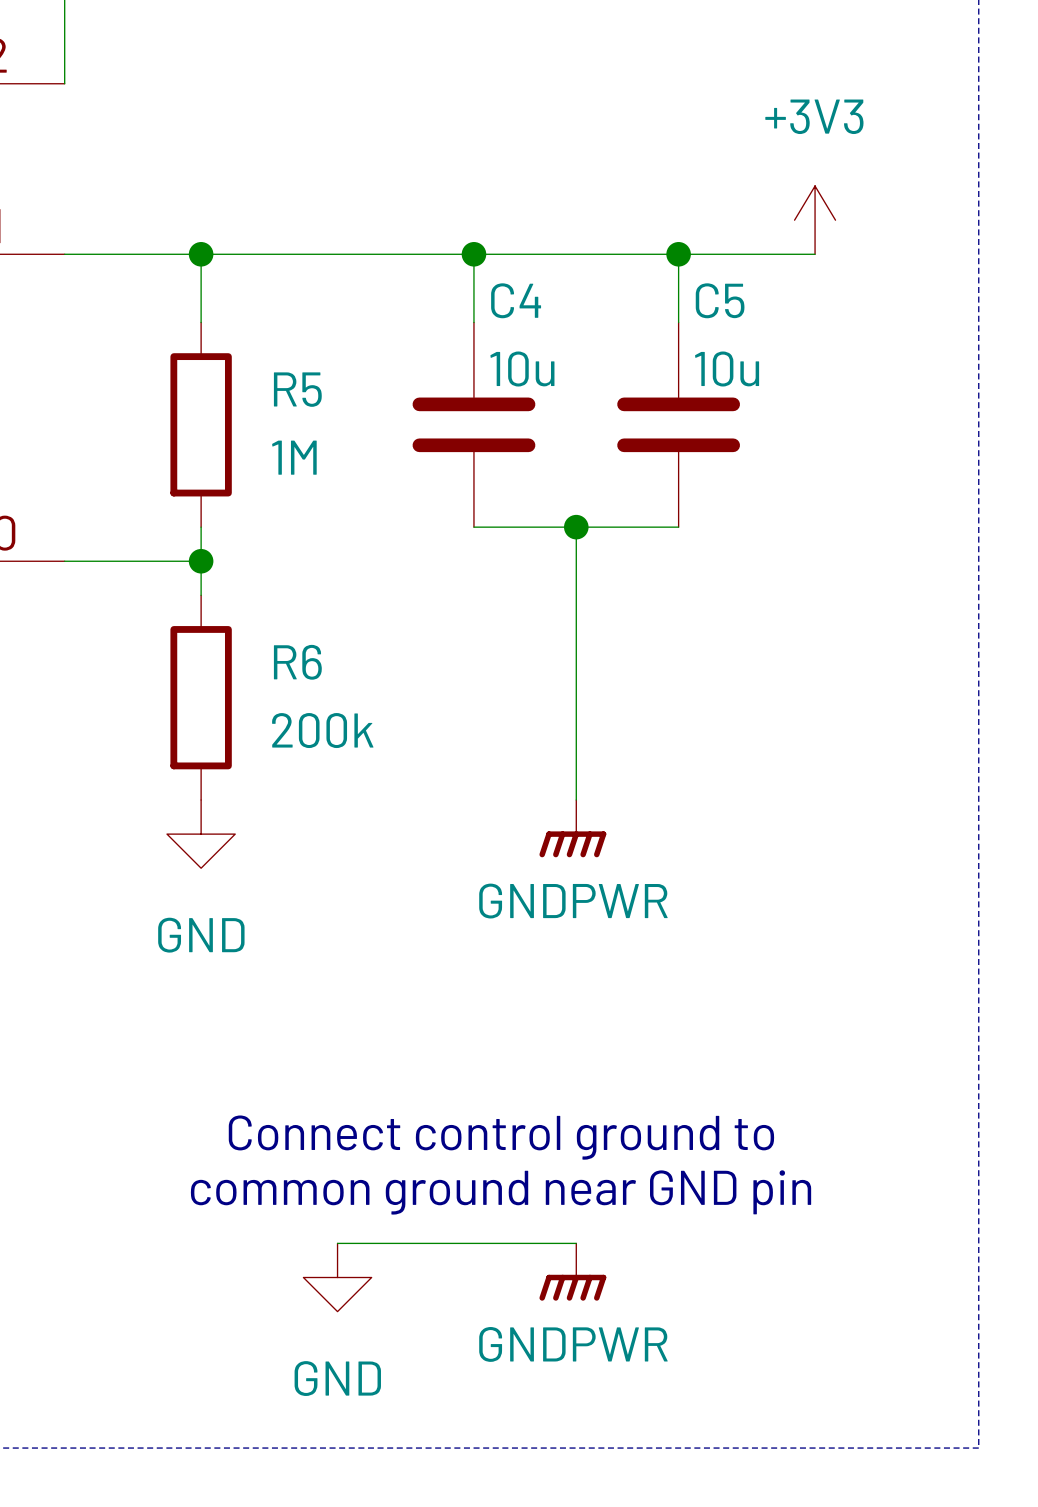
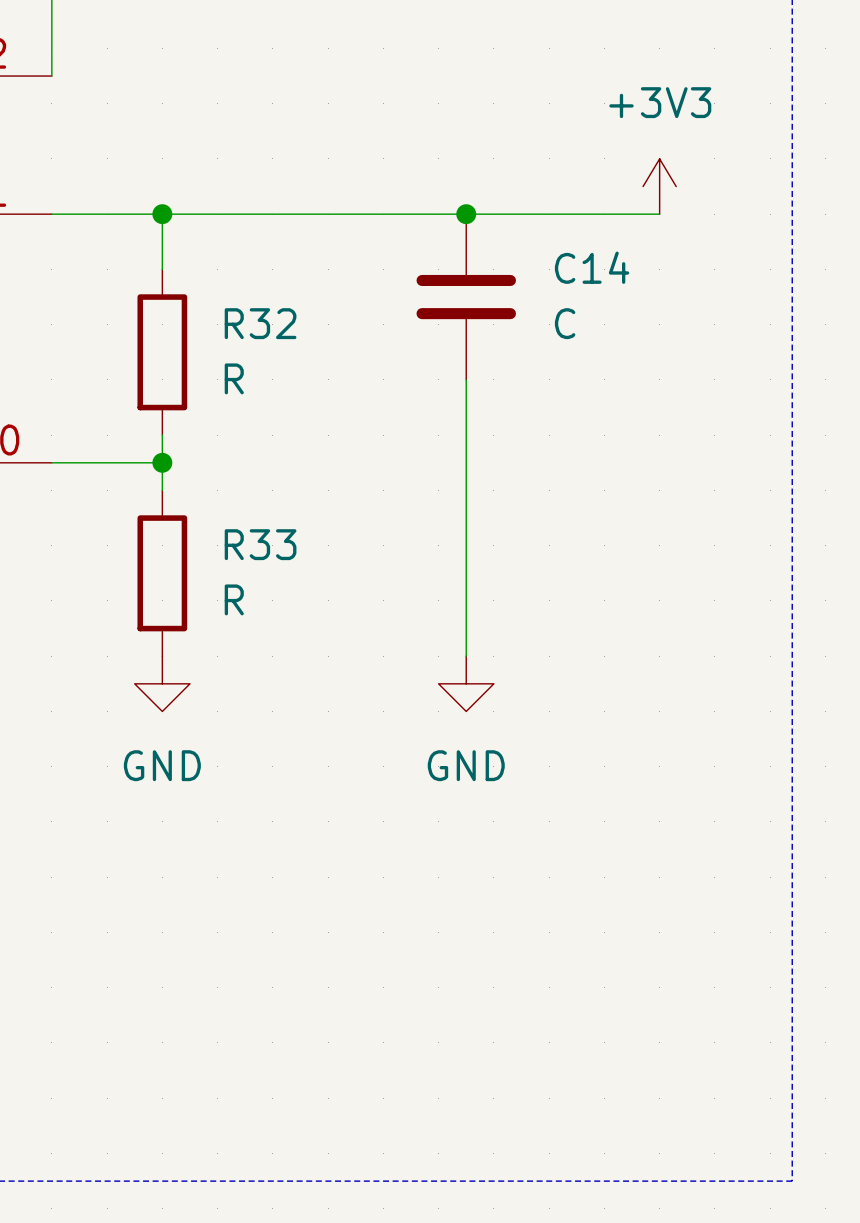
wire: (473, 254) (473, 322) -> (466, 379) (466, 435)
junction: (473, 254) -> none
junction: none -> (466, 214)
wire: (678, 254) (678, 322) -> none
junction: (678, 254) -> none
C14: none -> C (466, 297)
R5 name: R5 (297, 389) -> R32 (260, 323)
C4: 10u (473, 424) -> none
C5: 10u (678, 424) -> none
R5 value: 1M (294, 457) -> R (234, 378)
wire: (473, 527) (678, 527) -> none
junction: (576, 527) -> none
R6 name: R6 (297, 662) -> R33 (260, 544)
R6 value: 200k (322, 730) -> R (234, 599)
power symbol: GNDPWR (572, 828) -> GND (466, 683)
text: Connect control ground to (501, 1137) -> none
text: common ground near GND pin (501, 1192) -> none
wire: (337, 1243) (576, 1243) -> none
power symbol: GNDPWR (572, 1272) -> none
power symbol: GND (337, 1277) -> none

